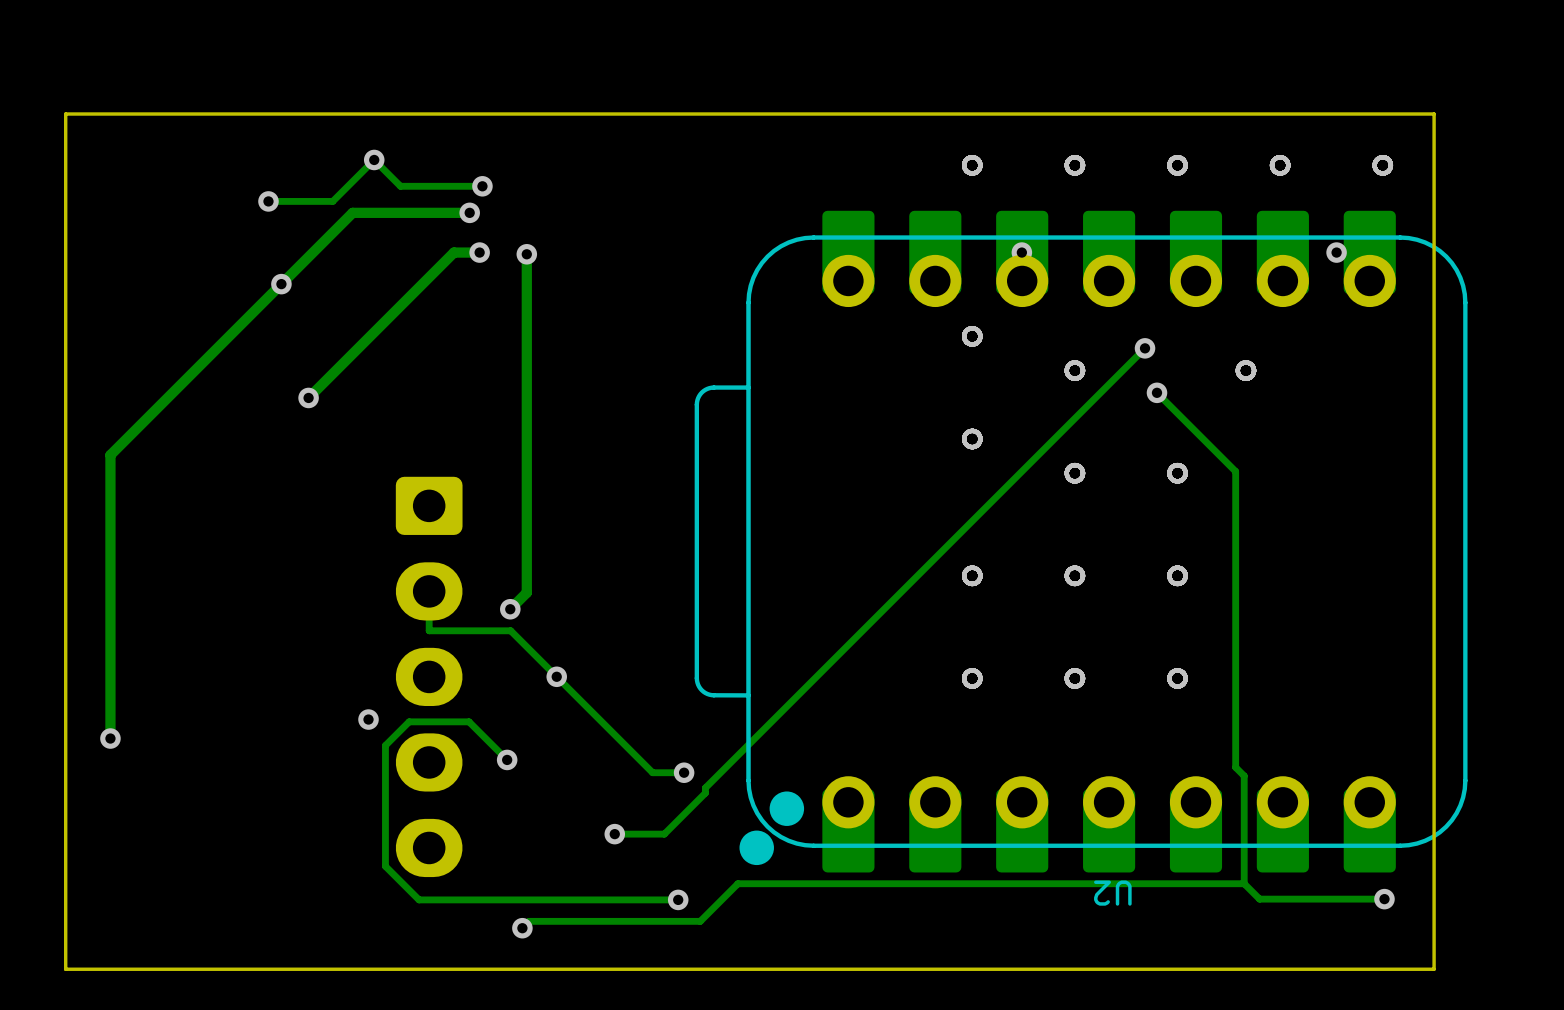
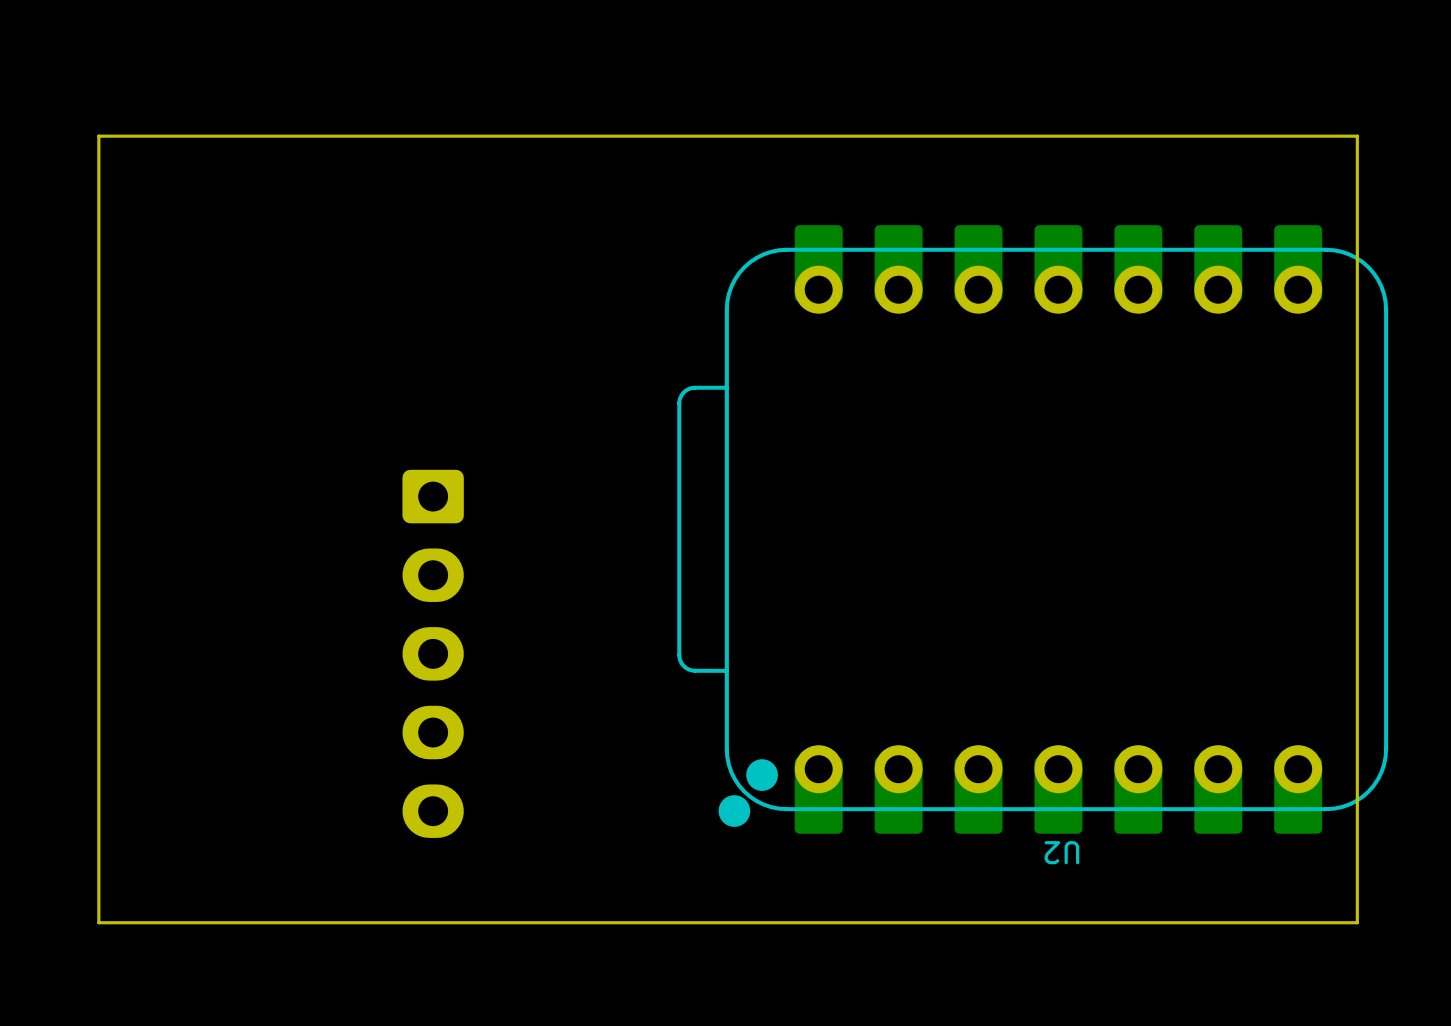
via: (374, 159) -> none
via: (972, 165) -> none
via: (1074, 165) -> none
via: (1177, 165) -> none
via: (1280, 165) -> none
via: (1382, 165) -> none
track: (482, 186) (400, 186) (374, 159) (332, 201) (268, 201) -> none
via: (482, 186) -> none
via: (268, 201) -> none
track: (469, 212) (352, 212) (110, 455) (110, 738) -> none
via: (469, 212) -> none
track: (479, 252) (453, 252) (308, 397) -> none
via: (479, 252) -> none
via: (1021, 252) -> none
via: (1336, 252) -> none
track: (526, 254) (526, 592) (510, 609) -> none
via: (526, 254) -> none
via: (281, 284) -> none
via: (972, 336) -> none
track: (1145, 348) (705, 787) (705, 793) (664, 834) (614, 834) -> none
via: (1145, 348) -> none
via: (1074, 370) -> none
via: (1245, 370) -> none
track: (1156, 392) (1235, 471) (1235, 767) (1244, 775) (1244, 883) -> none
via: (1156, 392) -> none
via: (308, 397) -> none
via: (972, 439) -> none
via: (1074, 473) -> none
via: (1177, 473) -> none
via: (972, 575) -> none
via: (1074, 575) -> none
via: (1177, 575) -> none
track: (429, 591) (429, 630) (510, 630) (652, 772) (684, 772) -> none
via: (510, 609) -> none
via: (556, 676) -> none
via: (972, 678) -> none
via: (1074, 678) -> none
via: (1177, 678) -> none
via: (368, 719) -> none
via: (110, 738) -> none
track: (507, 759) (469, 721) (409, 721) (385, 745) (385, 866) (419, 899) (678, 899) -> none
via: (507, 759) -> none
via: (684, 772) -> none
via: (614, 834) -> none
track: (1244, 883) (737, 883) (700, 921) (529, 921) (522, 928) -> none
track: (1244, 883) (1259, 899) (1384, 899) -> none
via: (678, 899) -> none
via: (1384, 899) -> none
via: (522, 928) -> none

